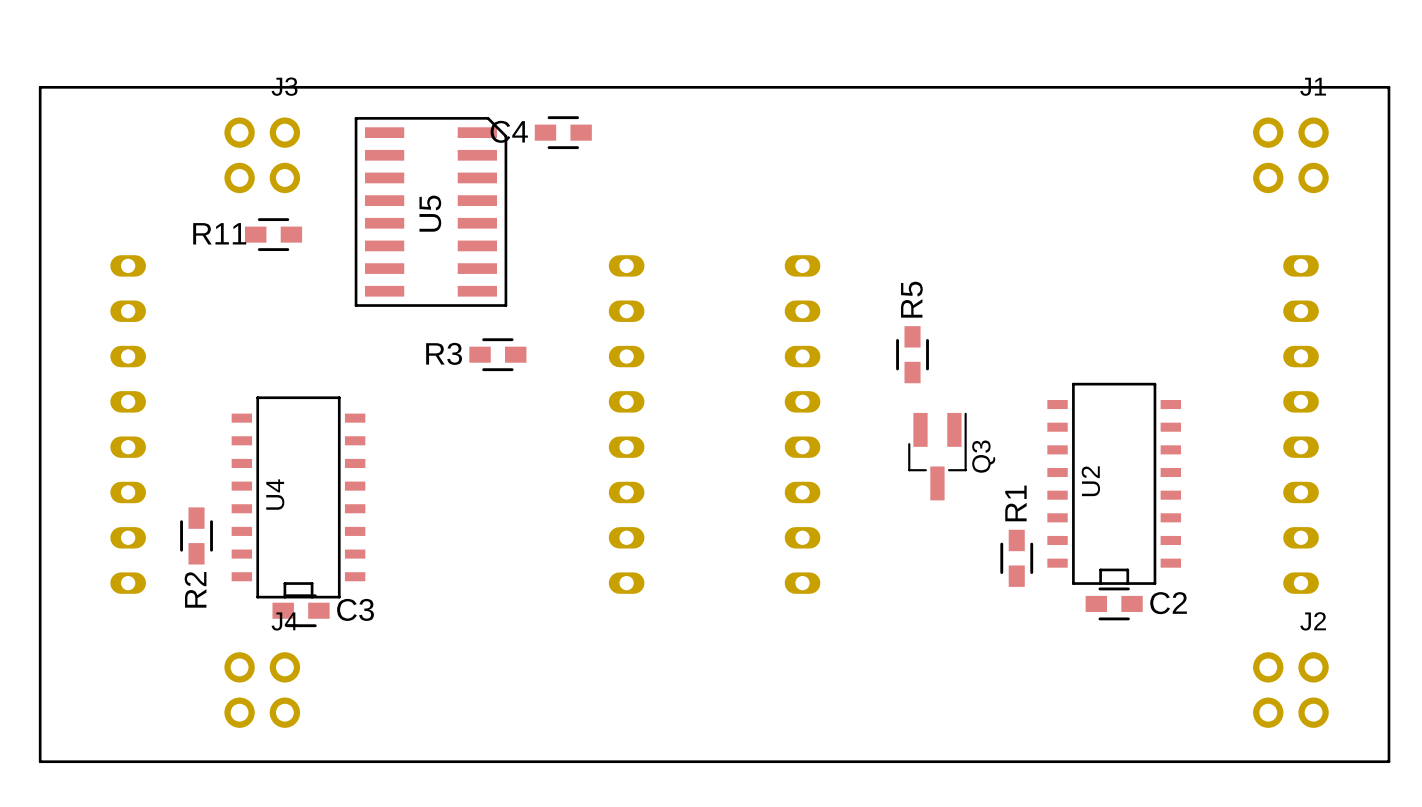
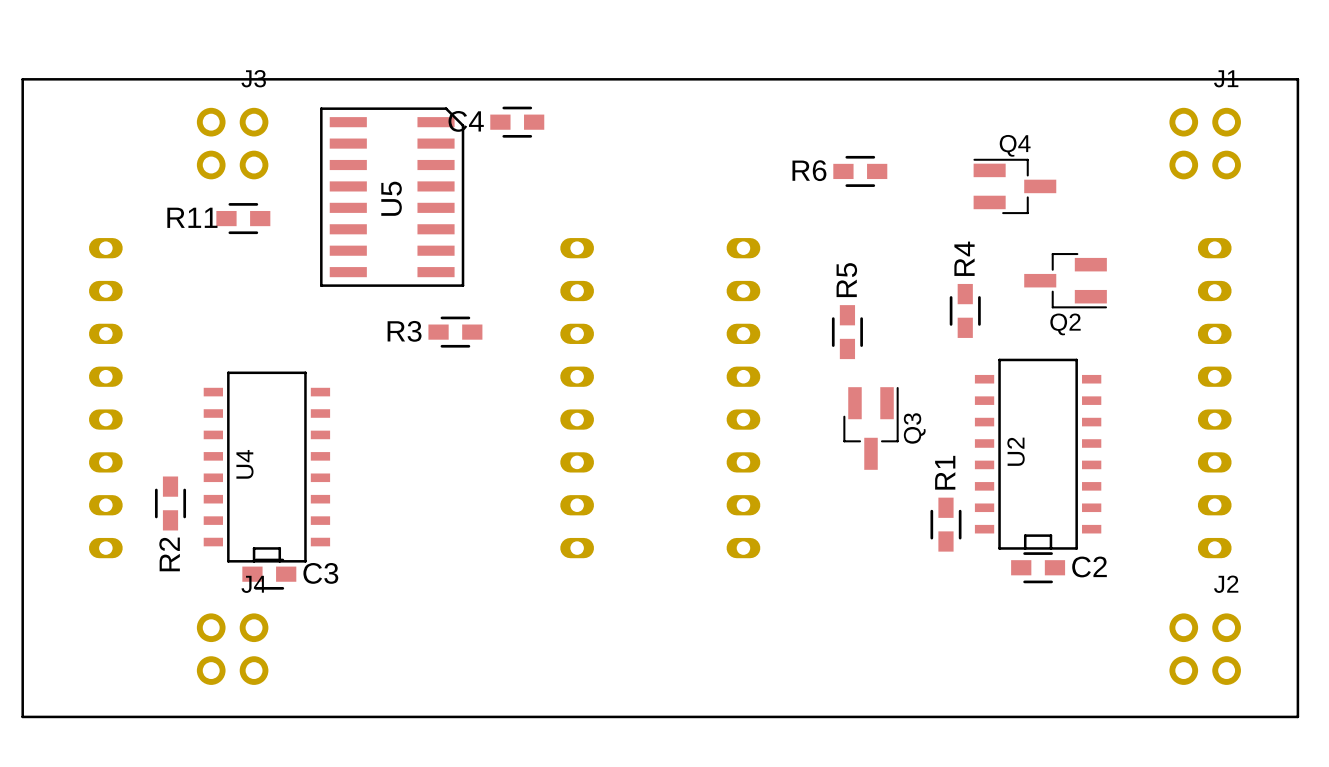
R6: none -> (860, 171)
Q4: none -> (1014, 186)
Q2: none -> (1065, 280)
R4: none -> (965, 310)

